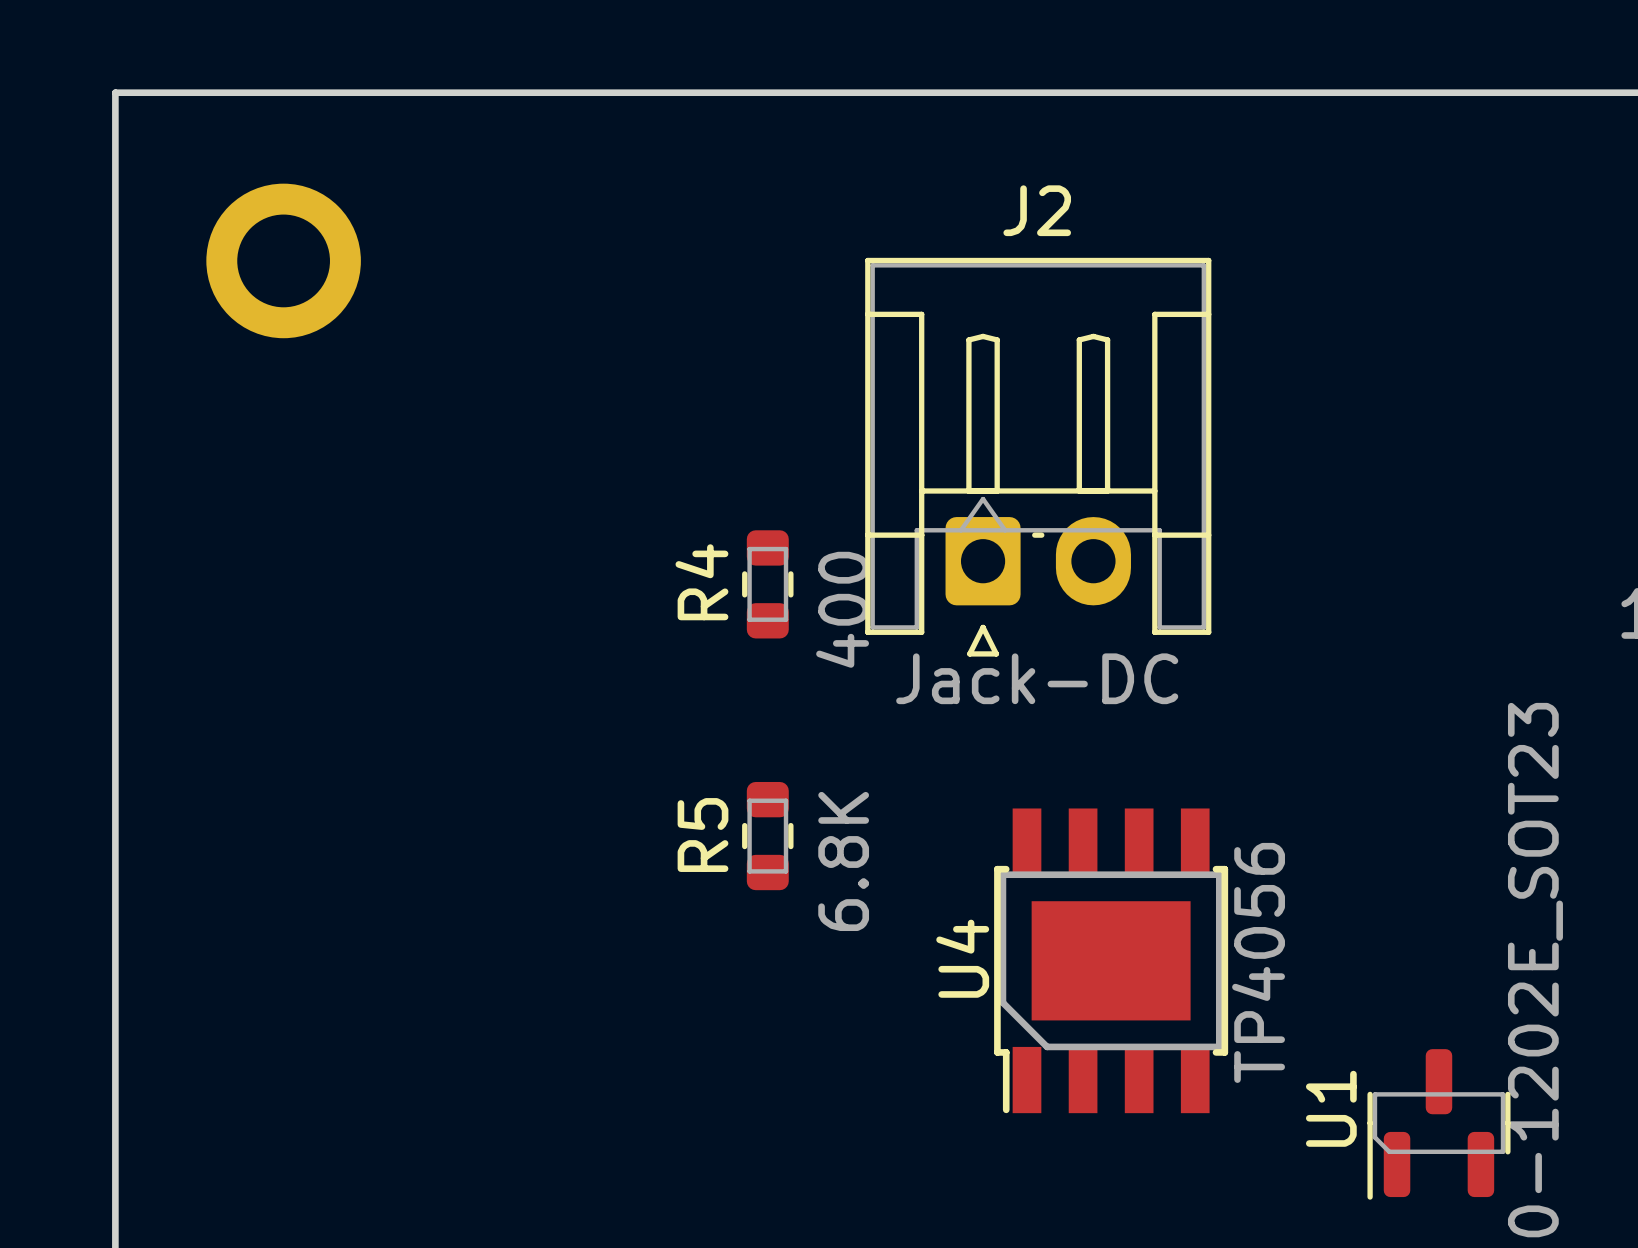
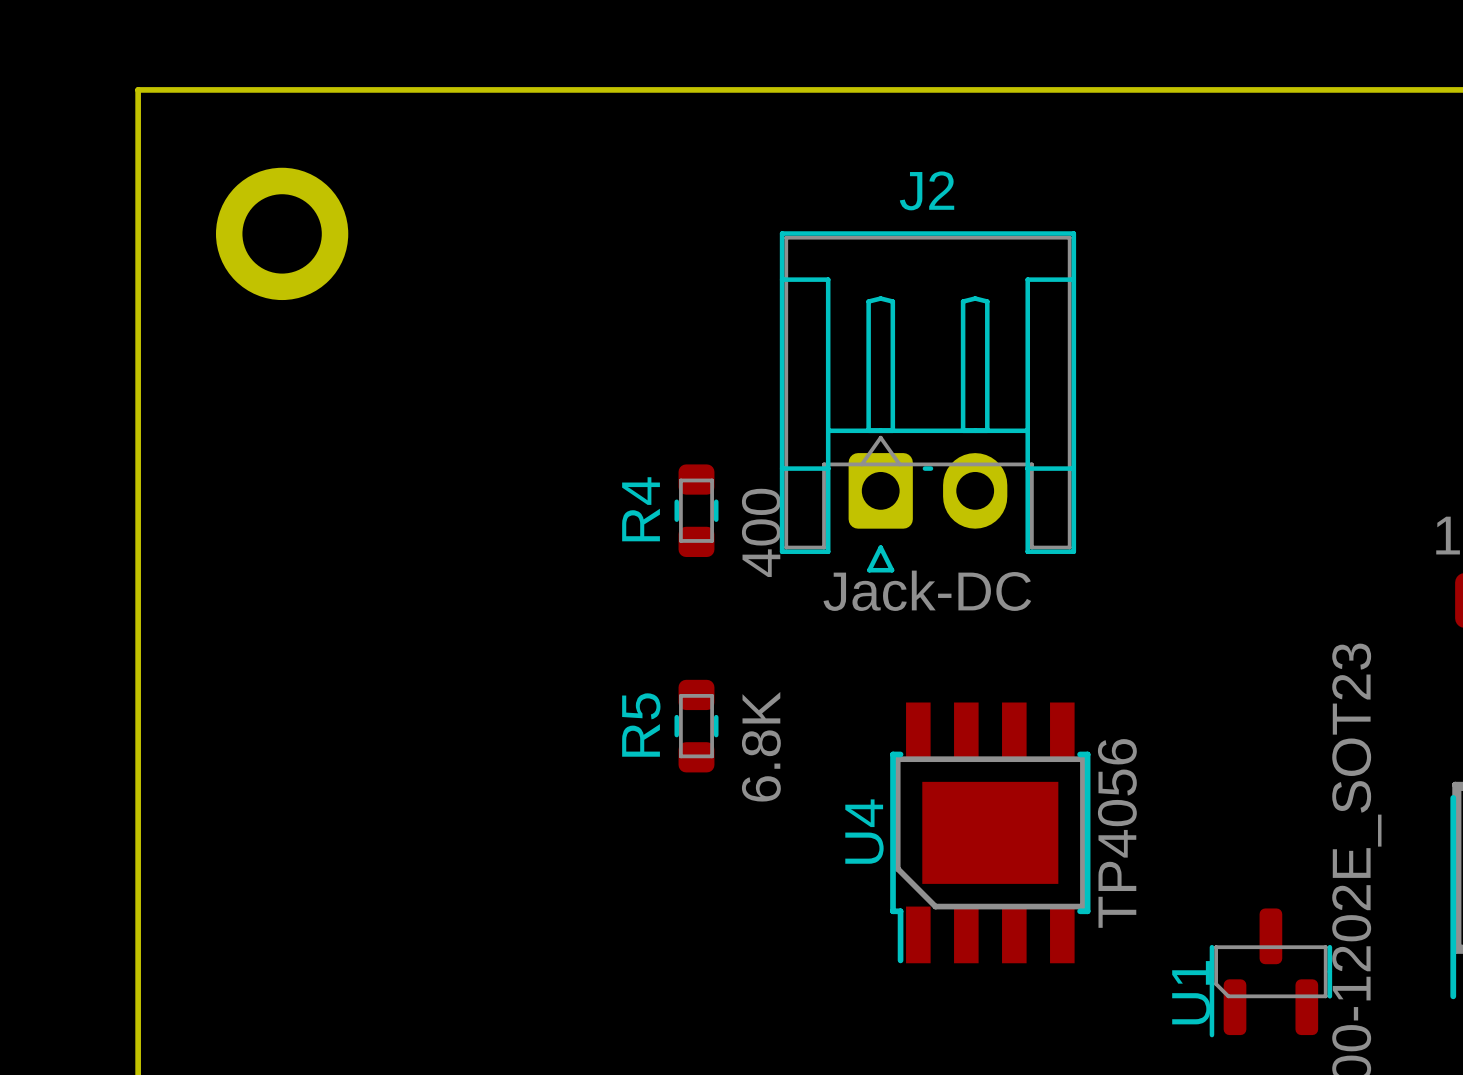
U1 name position: U1 (1331, 1108) -> U1 (1191, 992)

